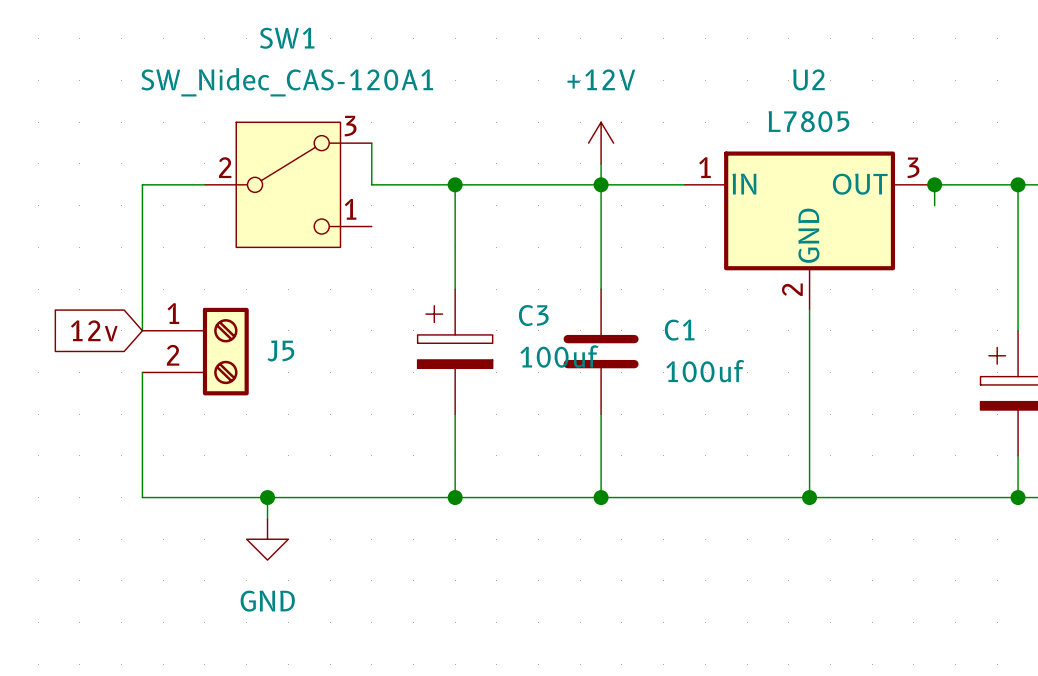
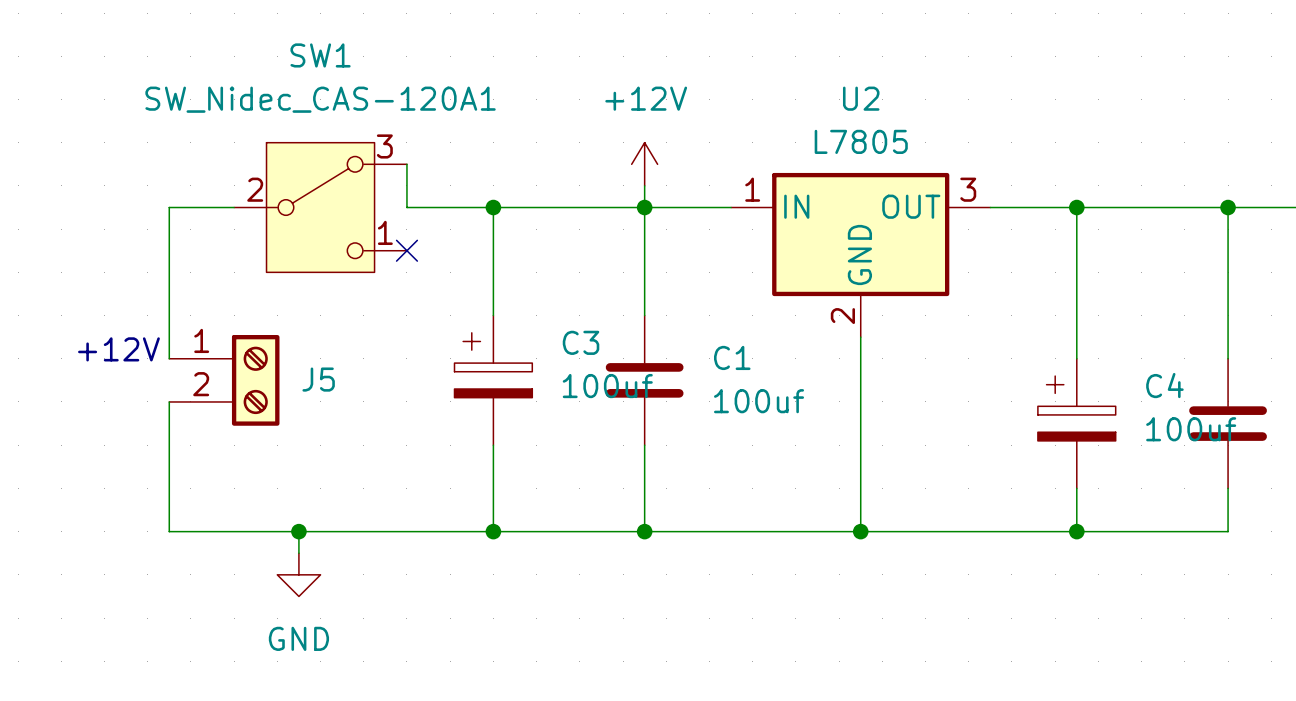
wire: (934, 184) (934, 205) -> none
junction: (934, 184) -> none
no-connect mark: none -> (406, 250)
text: none -> +12V (118, 349)
global label: 12v (94, 330) -> none

